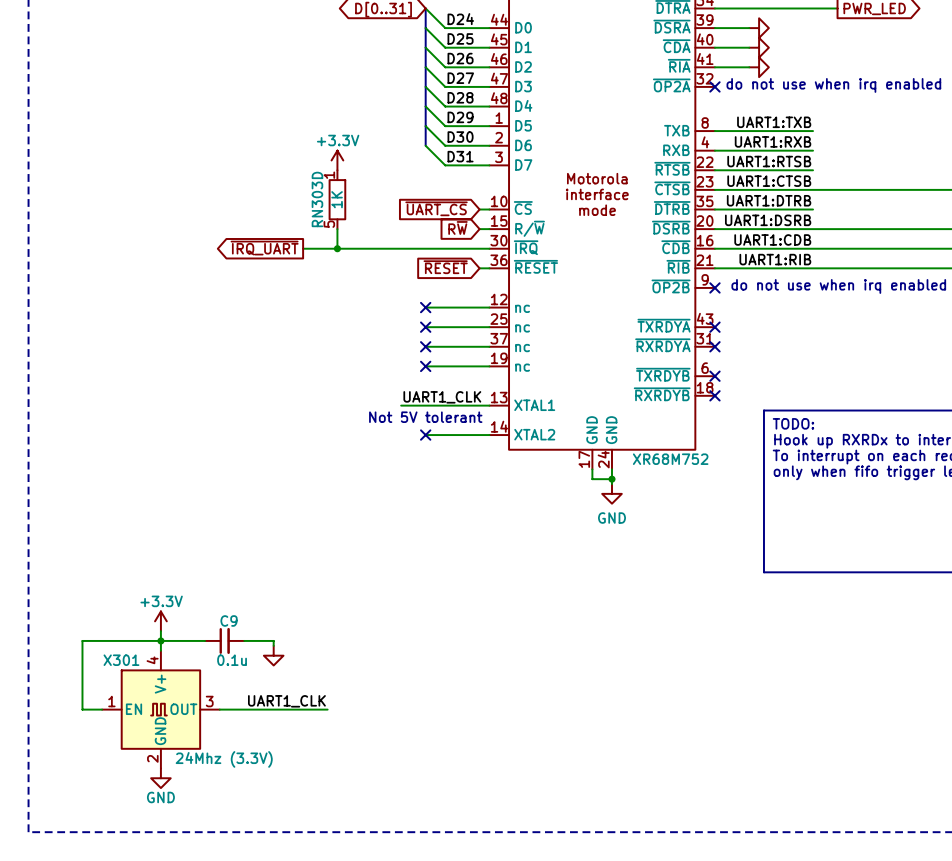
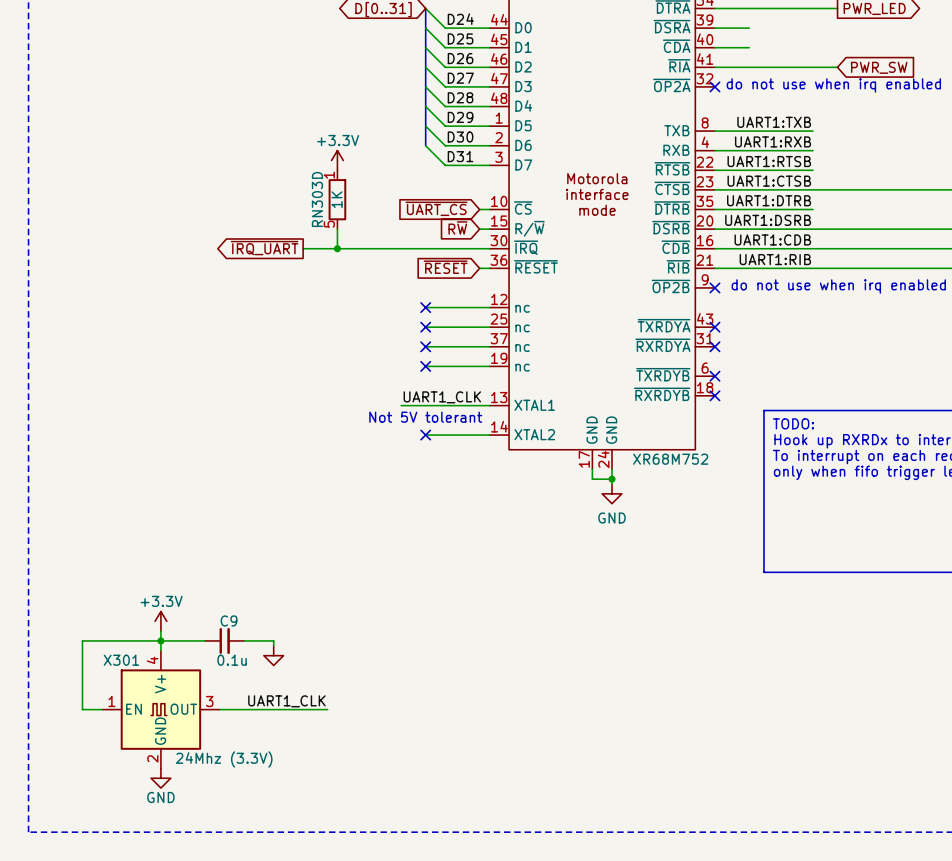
power symbol: (759, 28) -> none
power symbol: (759, 47) -> none
wire: none -> (749, 67) (837, 67)
power symbol: (759, 67) -> none
global label: none -> PWR_SW (879, 67)

